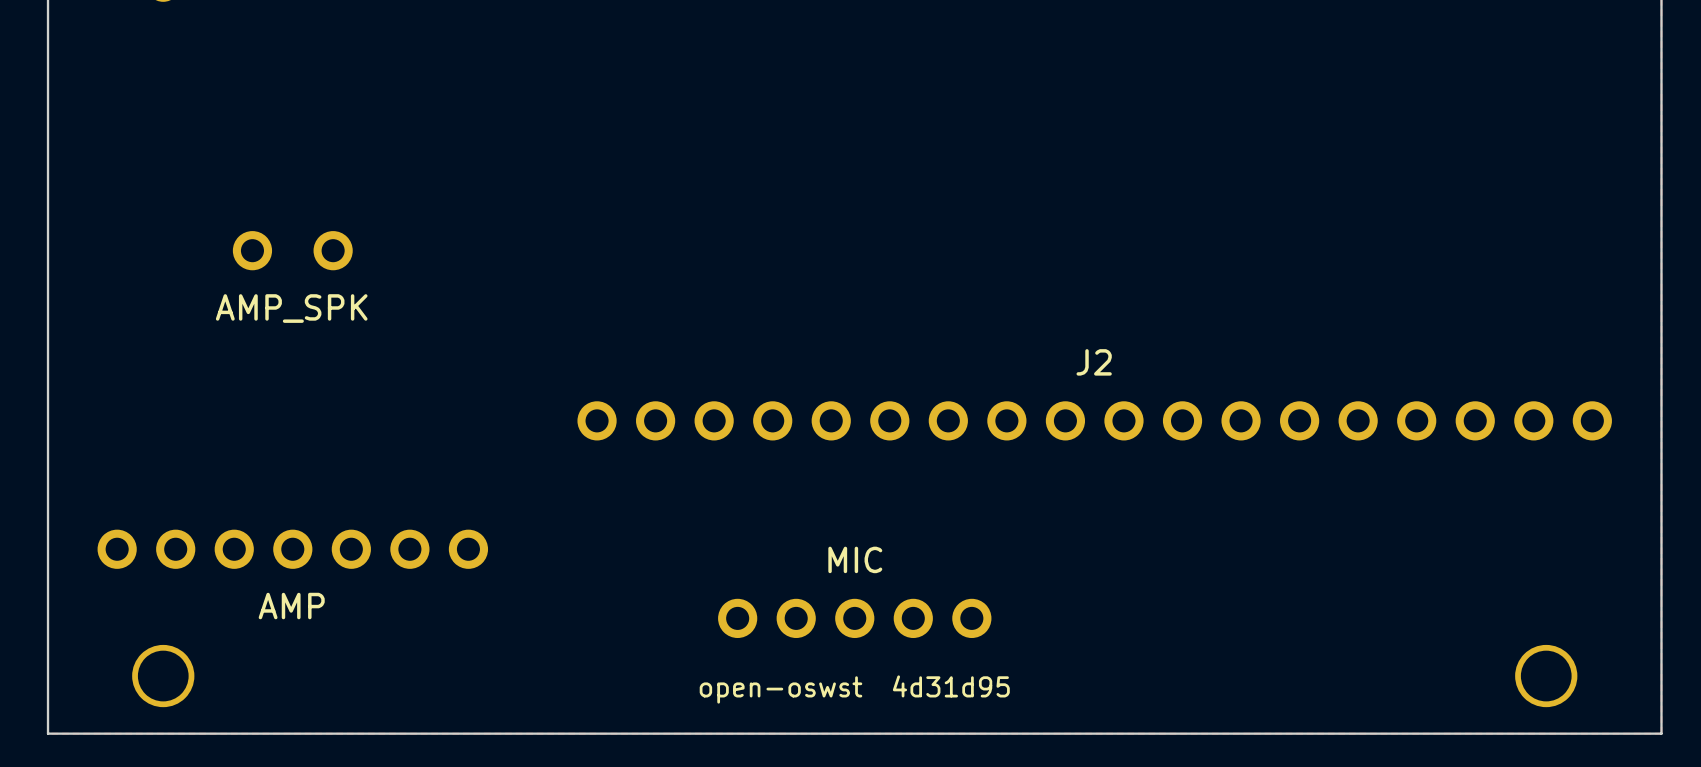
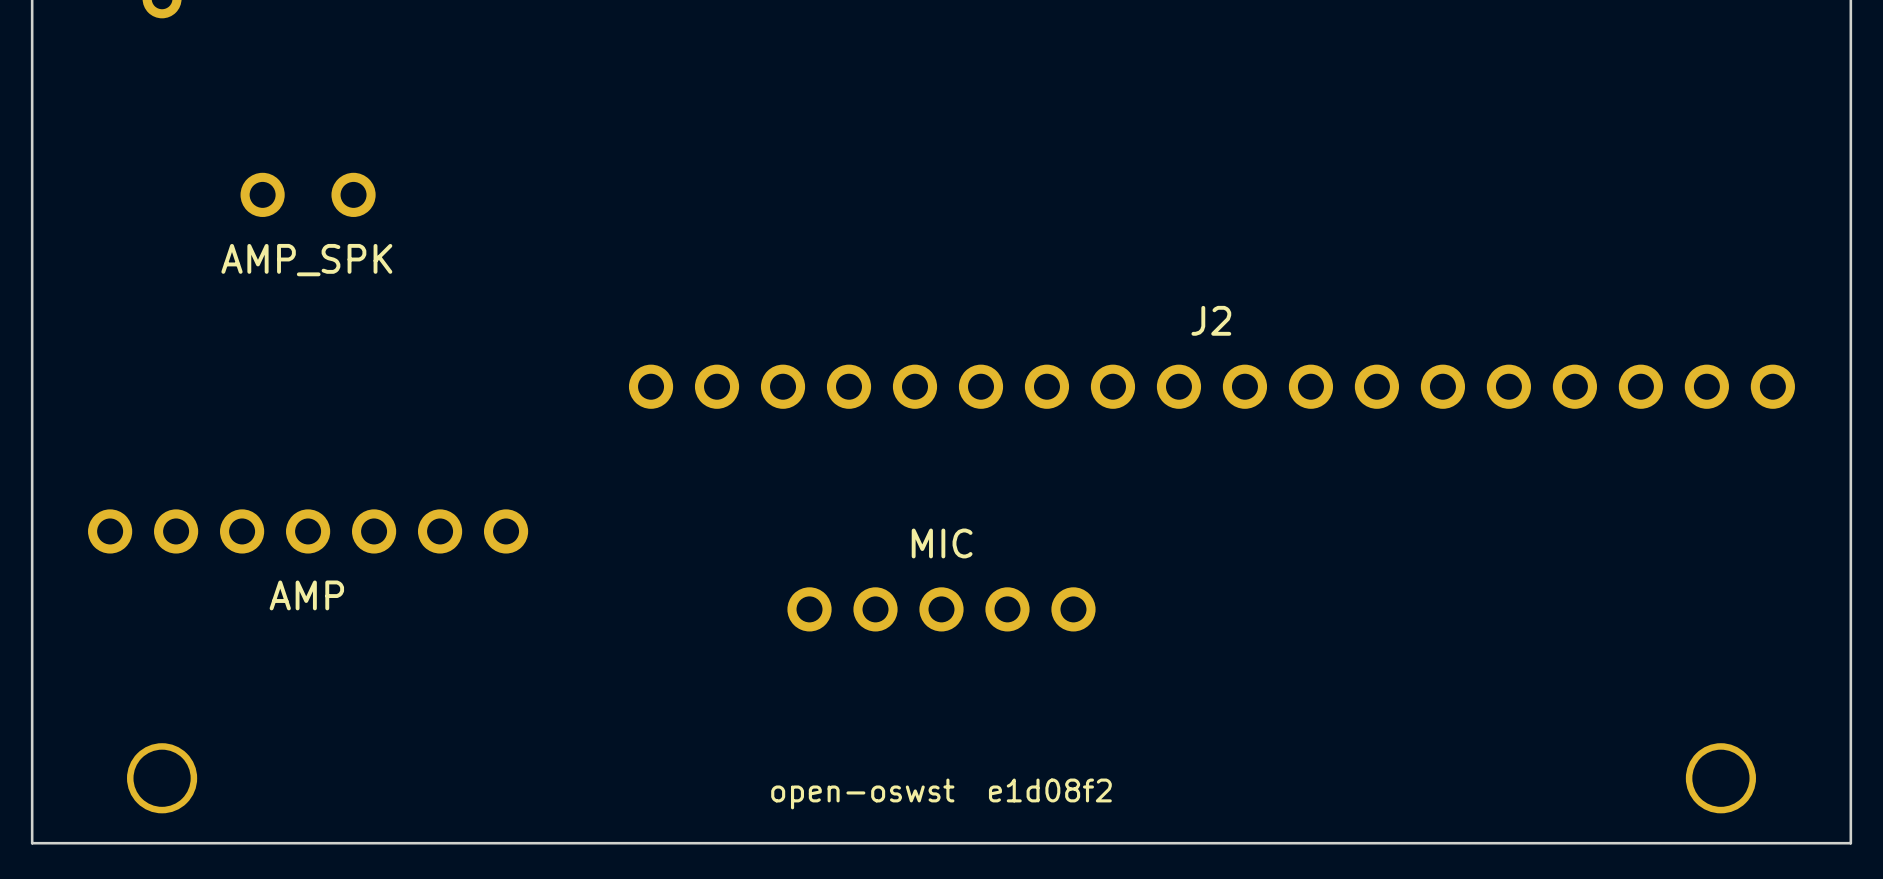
AMP_SPK position: (292, 250) -> (308, 194)
J2 position: (1094, 420) -> (1211, 386)
AMP position: (292, 549) -> (308, 531)
MIC position: (854, 618) -> (941, 609)
text: open-oswst 4d31d95 (854, 689) -> open-oswst e1d08f2 (941, 793)

